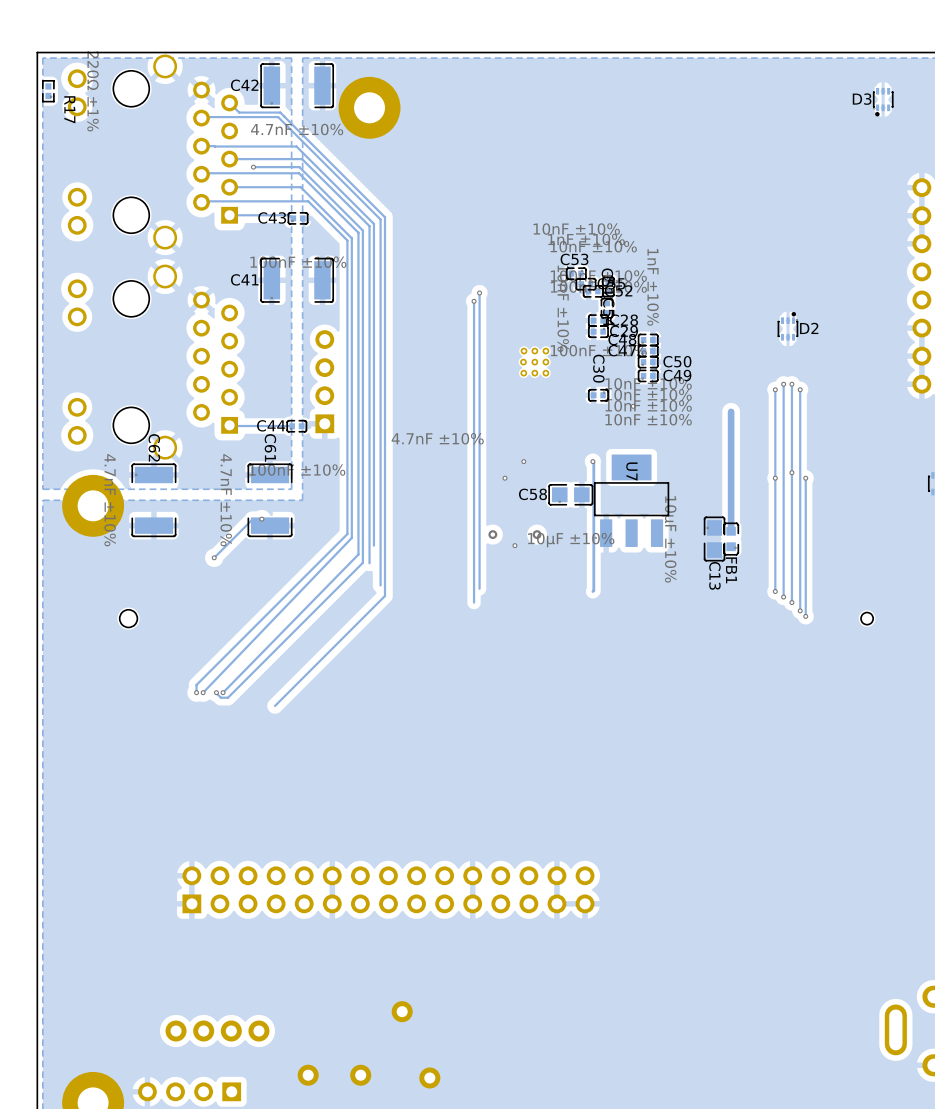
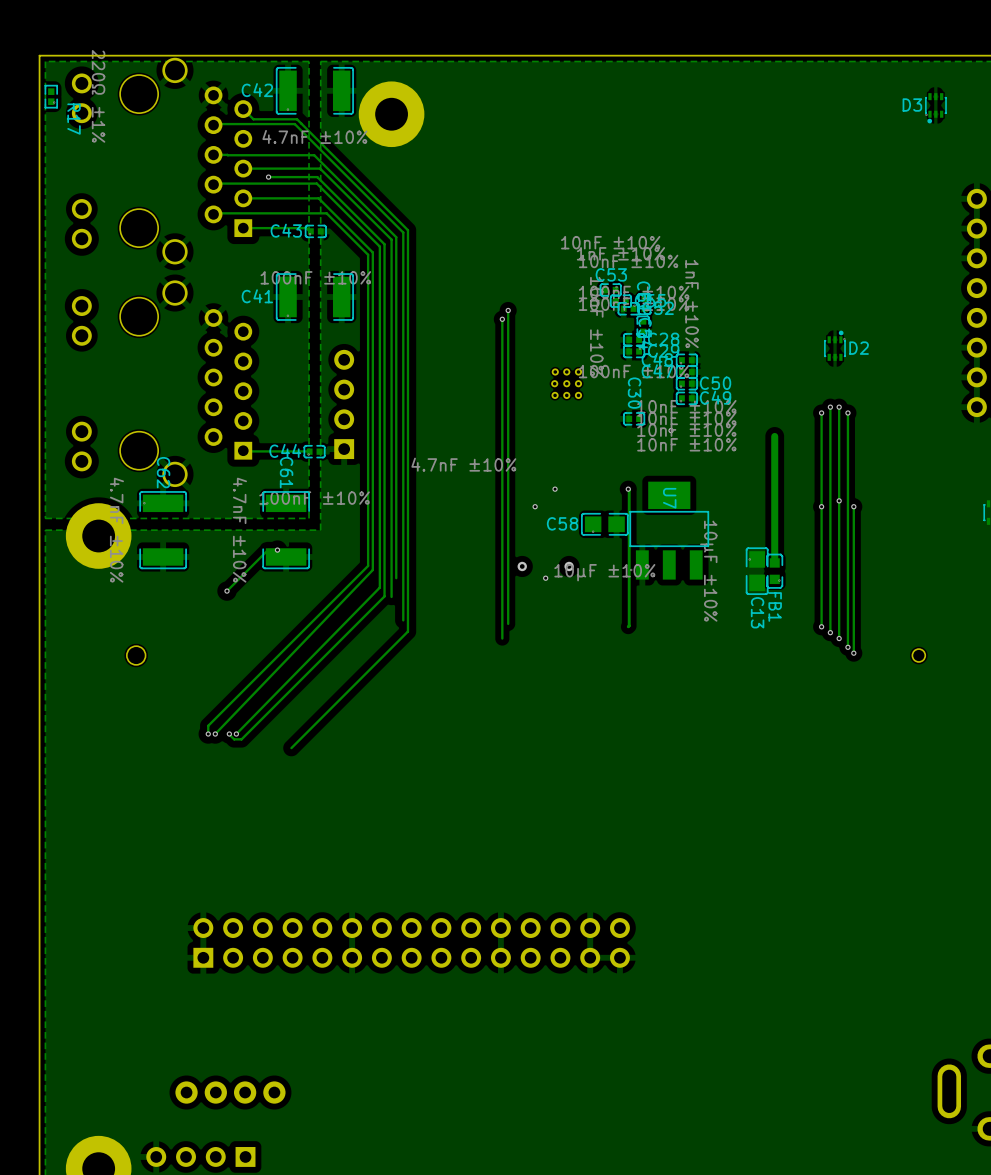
part: (402, 1011) -> none
part: (308, 1075) -> none
part: (360, 1075) -> none
part: (429, 1078) -> none

